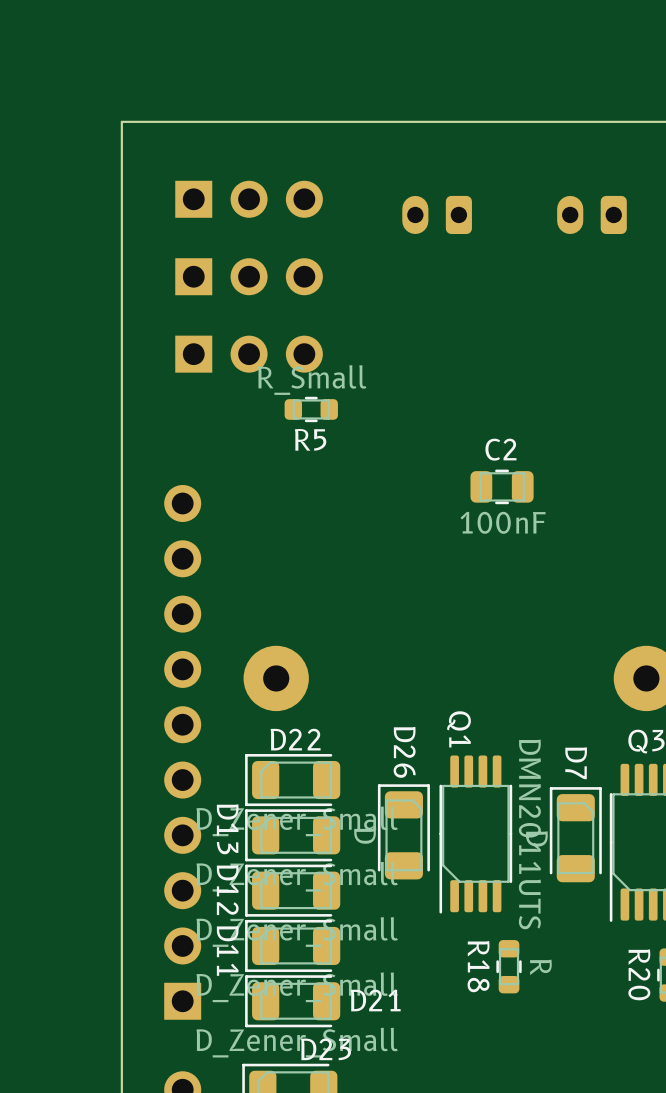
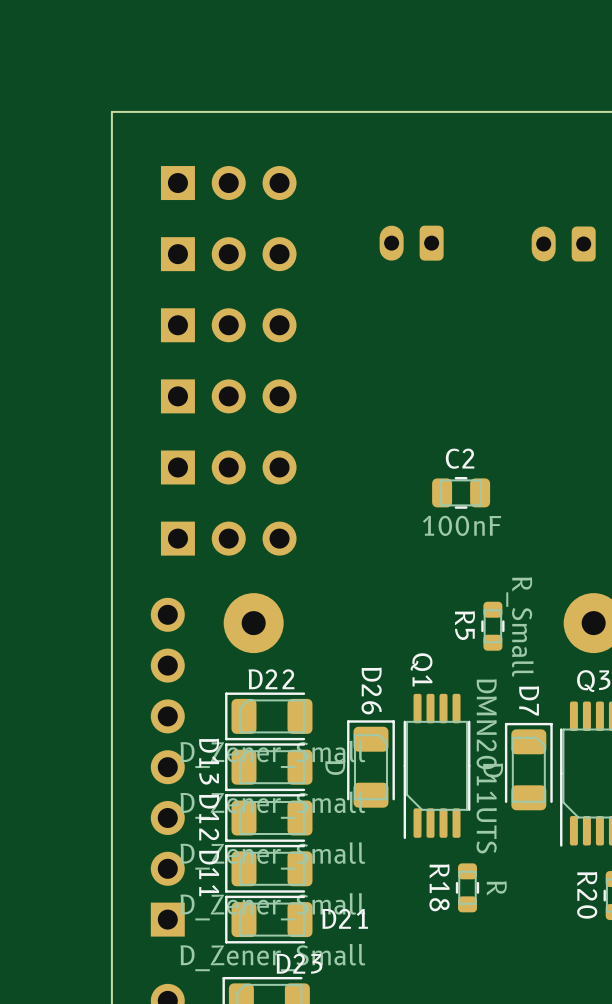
part position: (437, 214) -> (411, 243)
part position: (591, 214) -> (563, 243)
R5 rotation: 0° (311, 409) -> 90° clockwise (492, 626)
R5 position: (311, 409) -> (492, 626)
part: none -> (228, 396)
C2 position: (502, 486) -> (461, 492)
part: none -> (228, 467)
part: none -> (228, 538)
part: (182, 752) -> none

